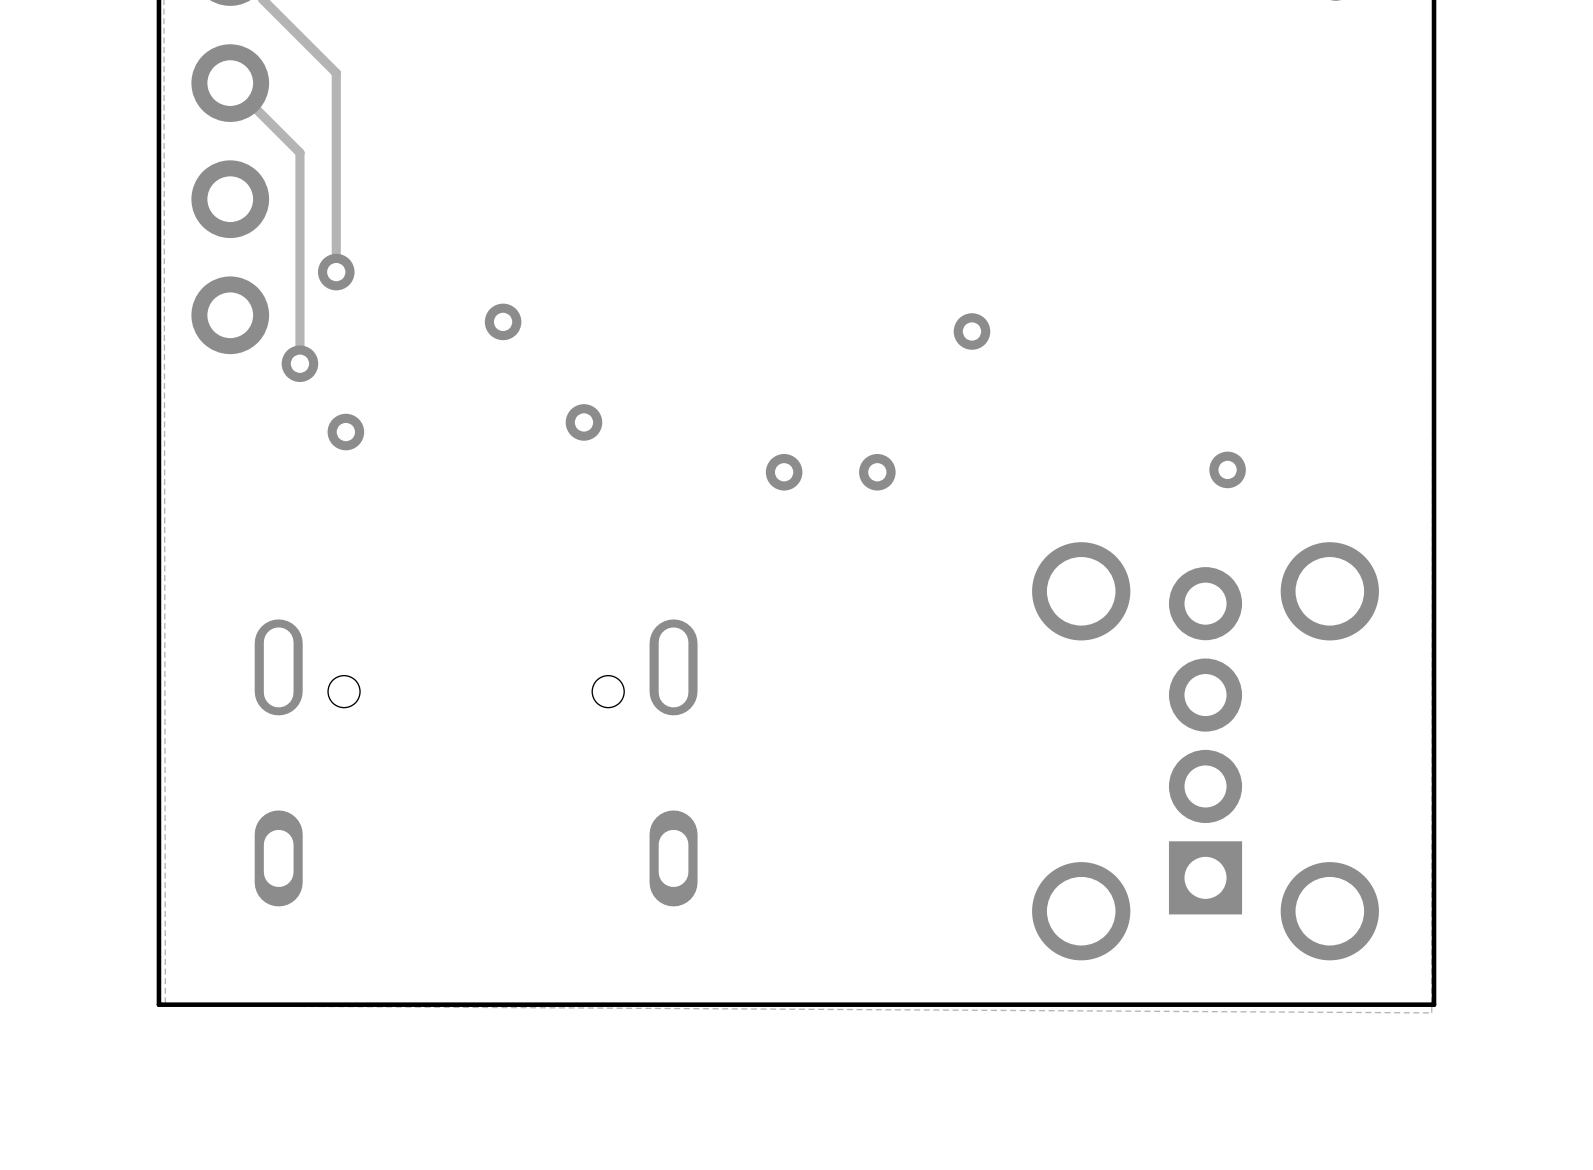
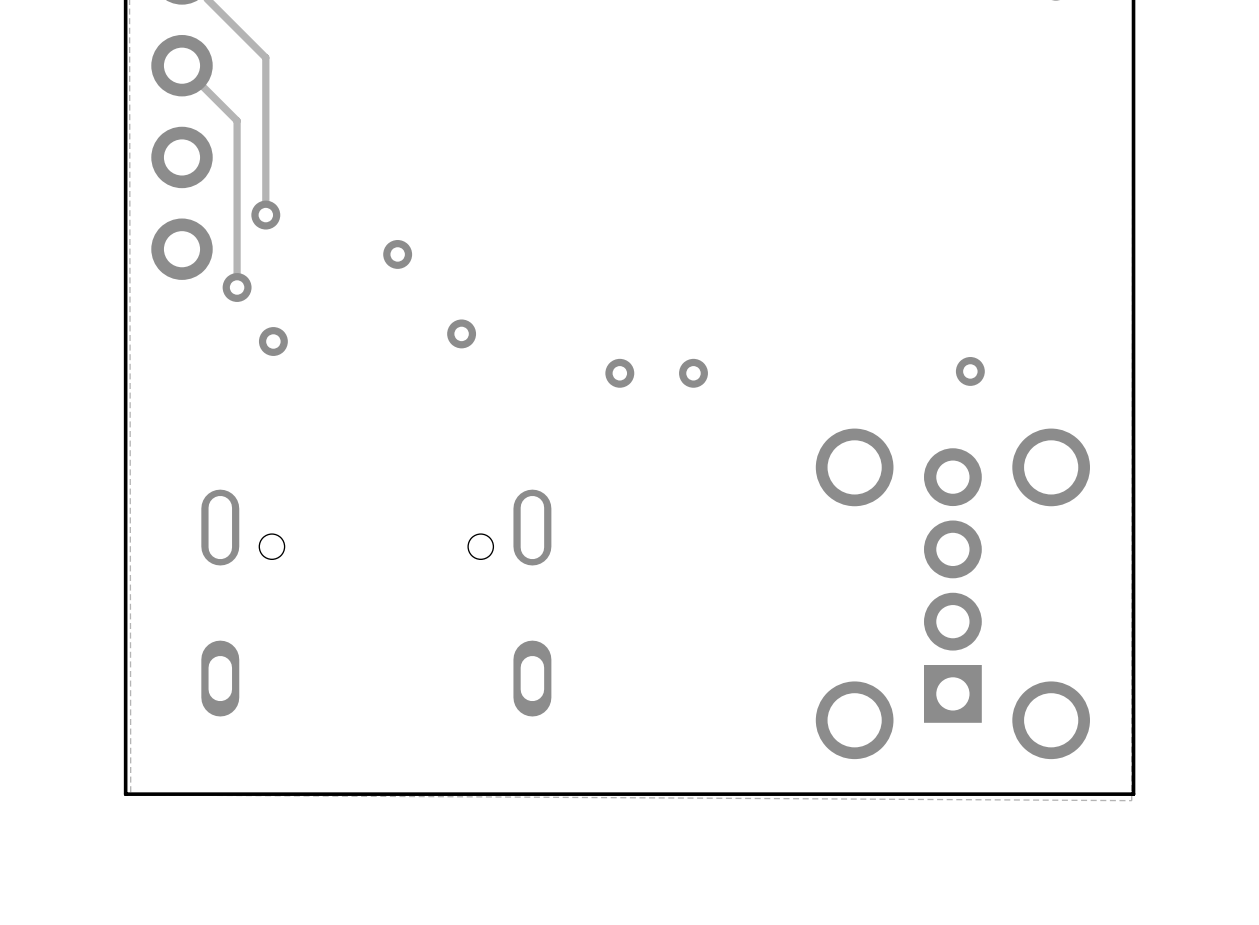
via: (971, 331) -> none

